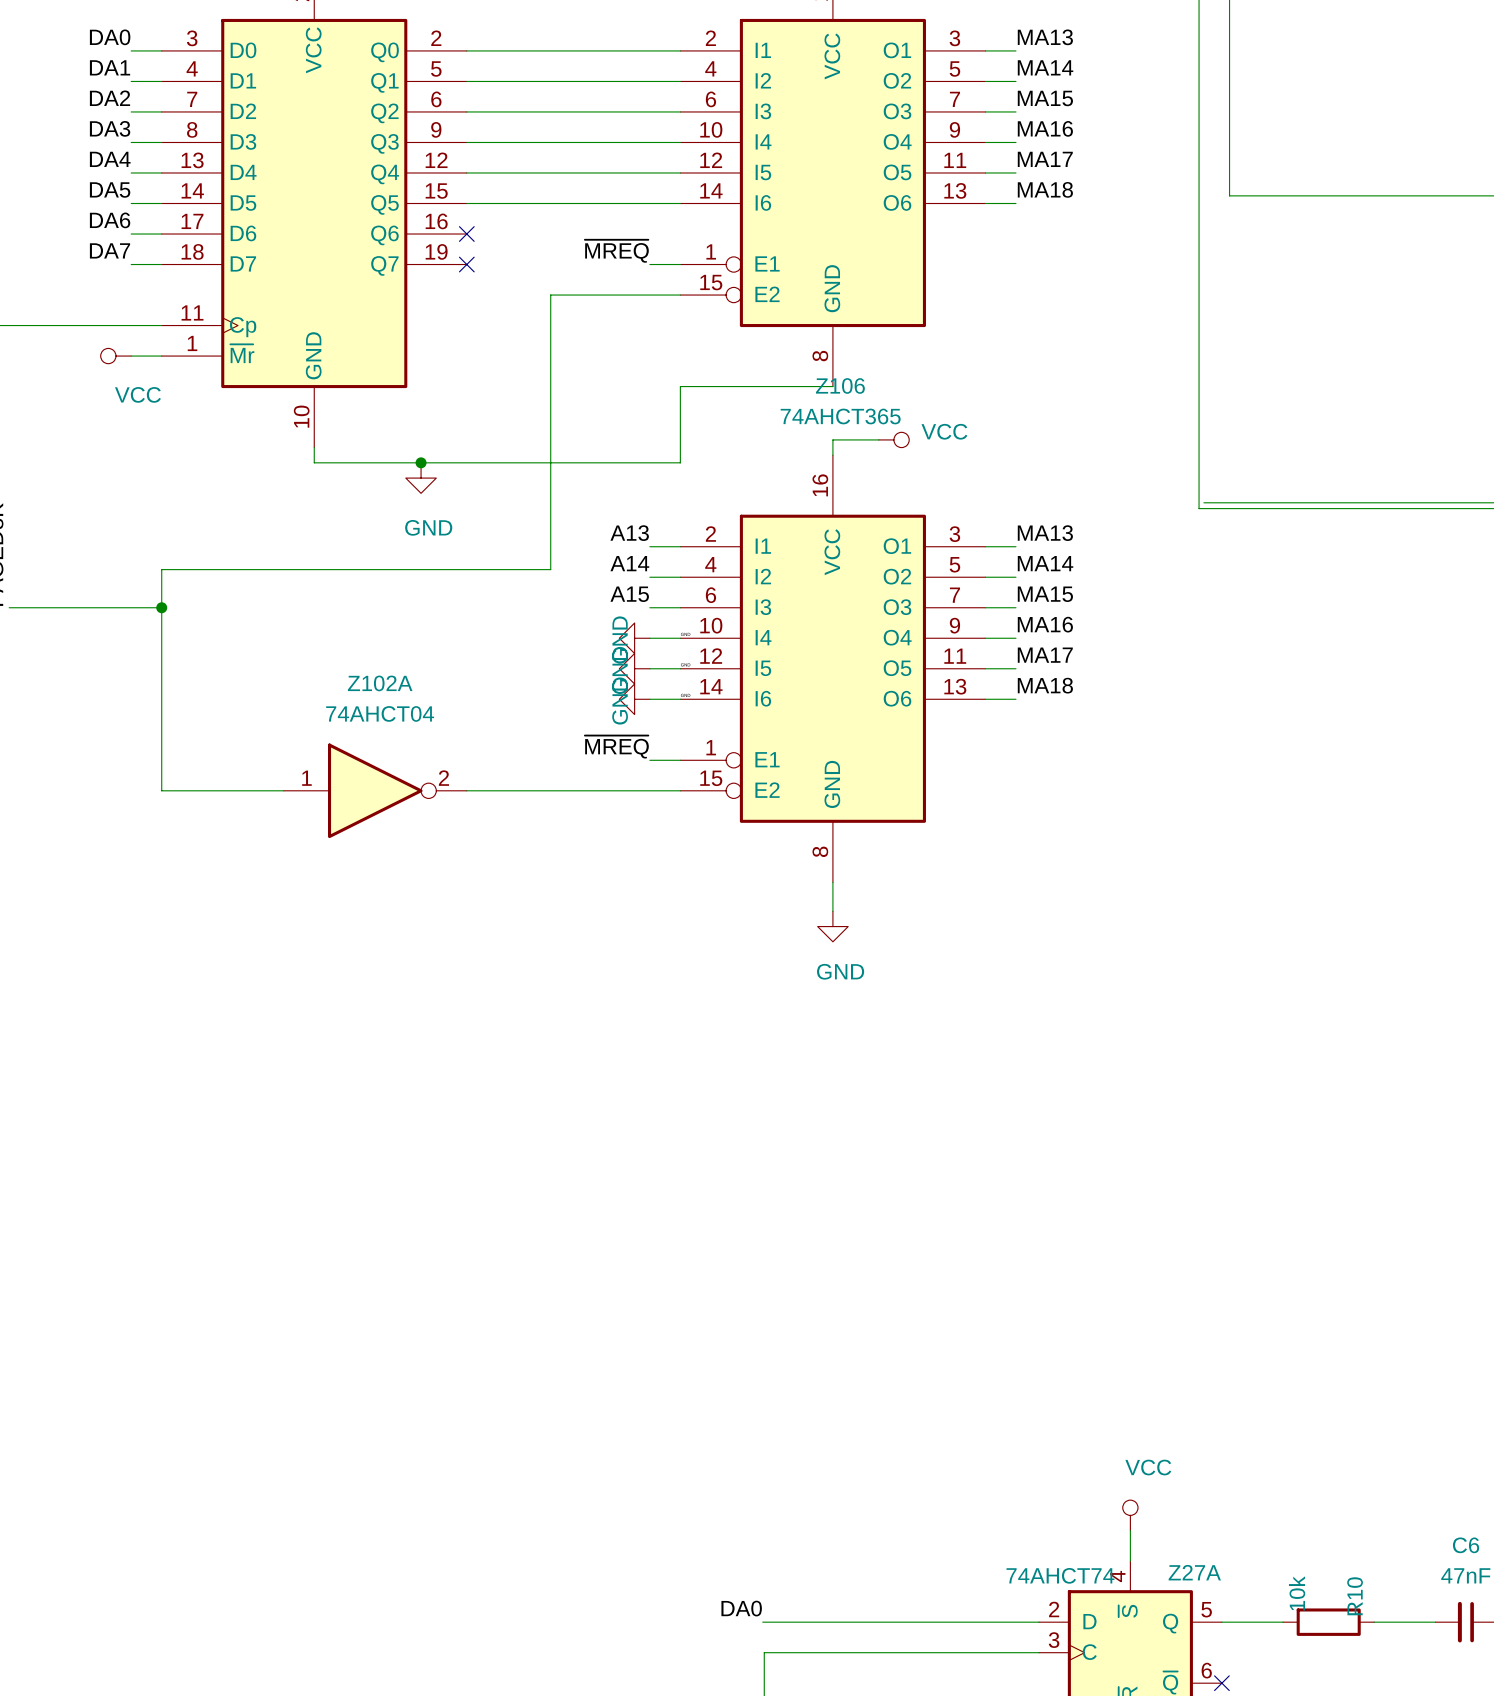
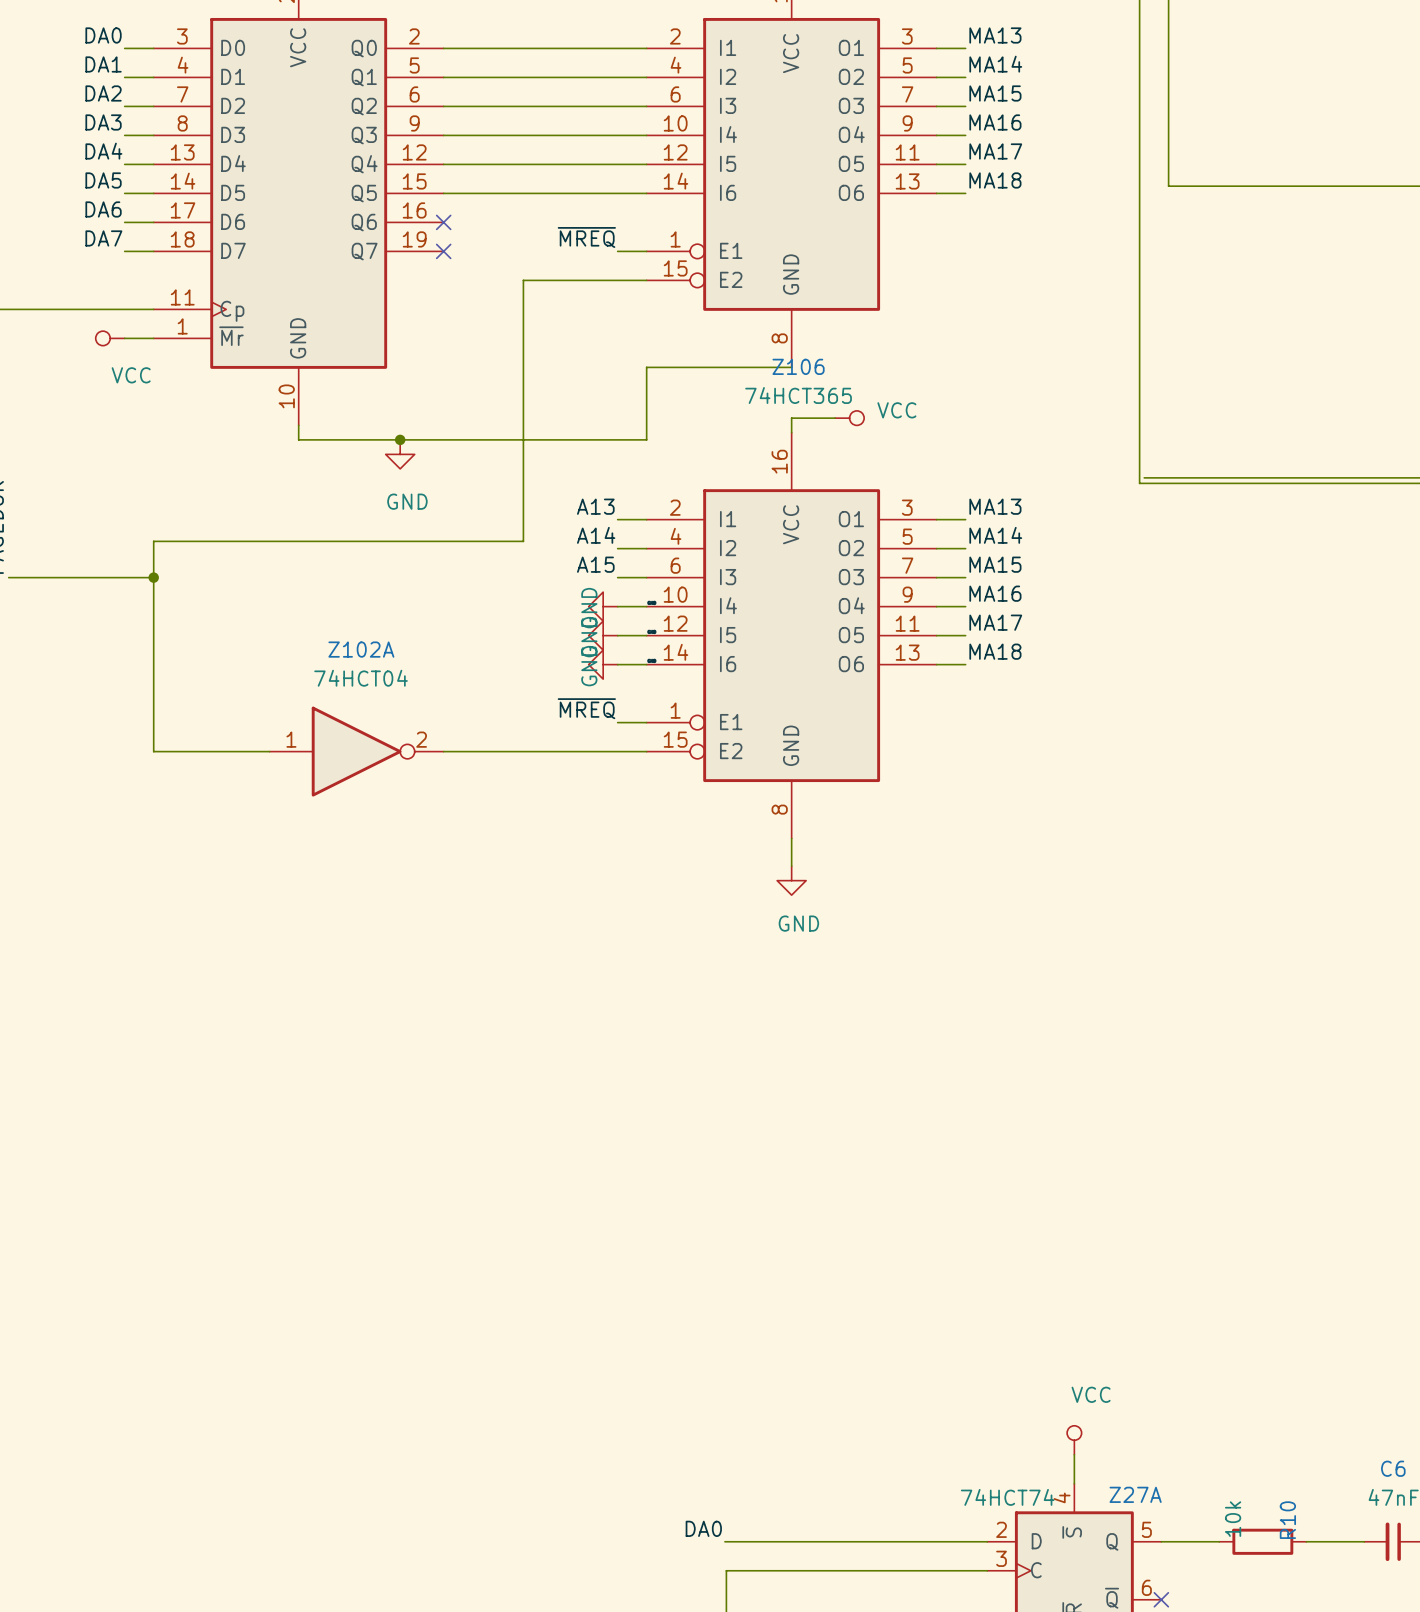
Z106 value: 74AHCT365 (840, 416) -> 74HCT365 (798, 395)
Z102A value: 74AHCT04 (380, 713) -> 74HCT04 (361, 678)
Z27A value: 74AHCT74 (1060, 1575) -> 74HCT74 (1007, 1497)

